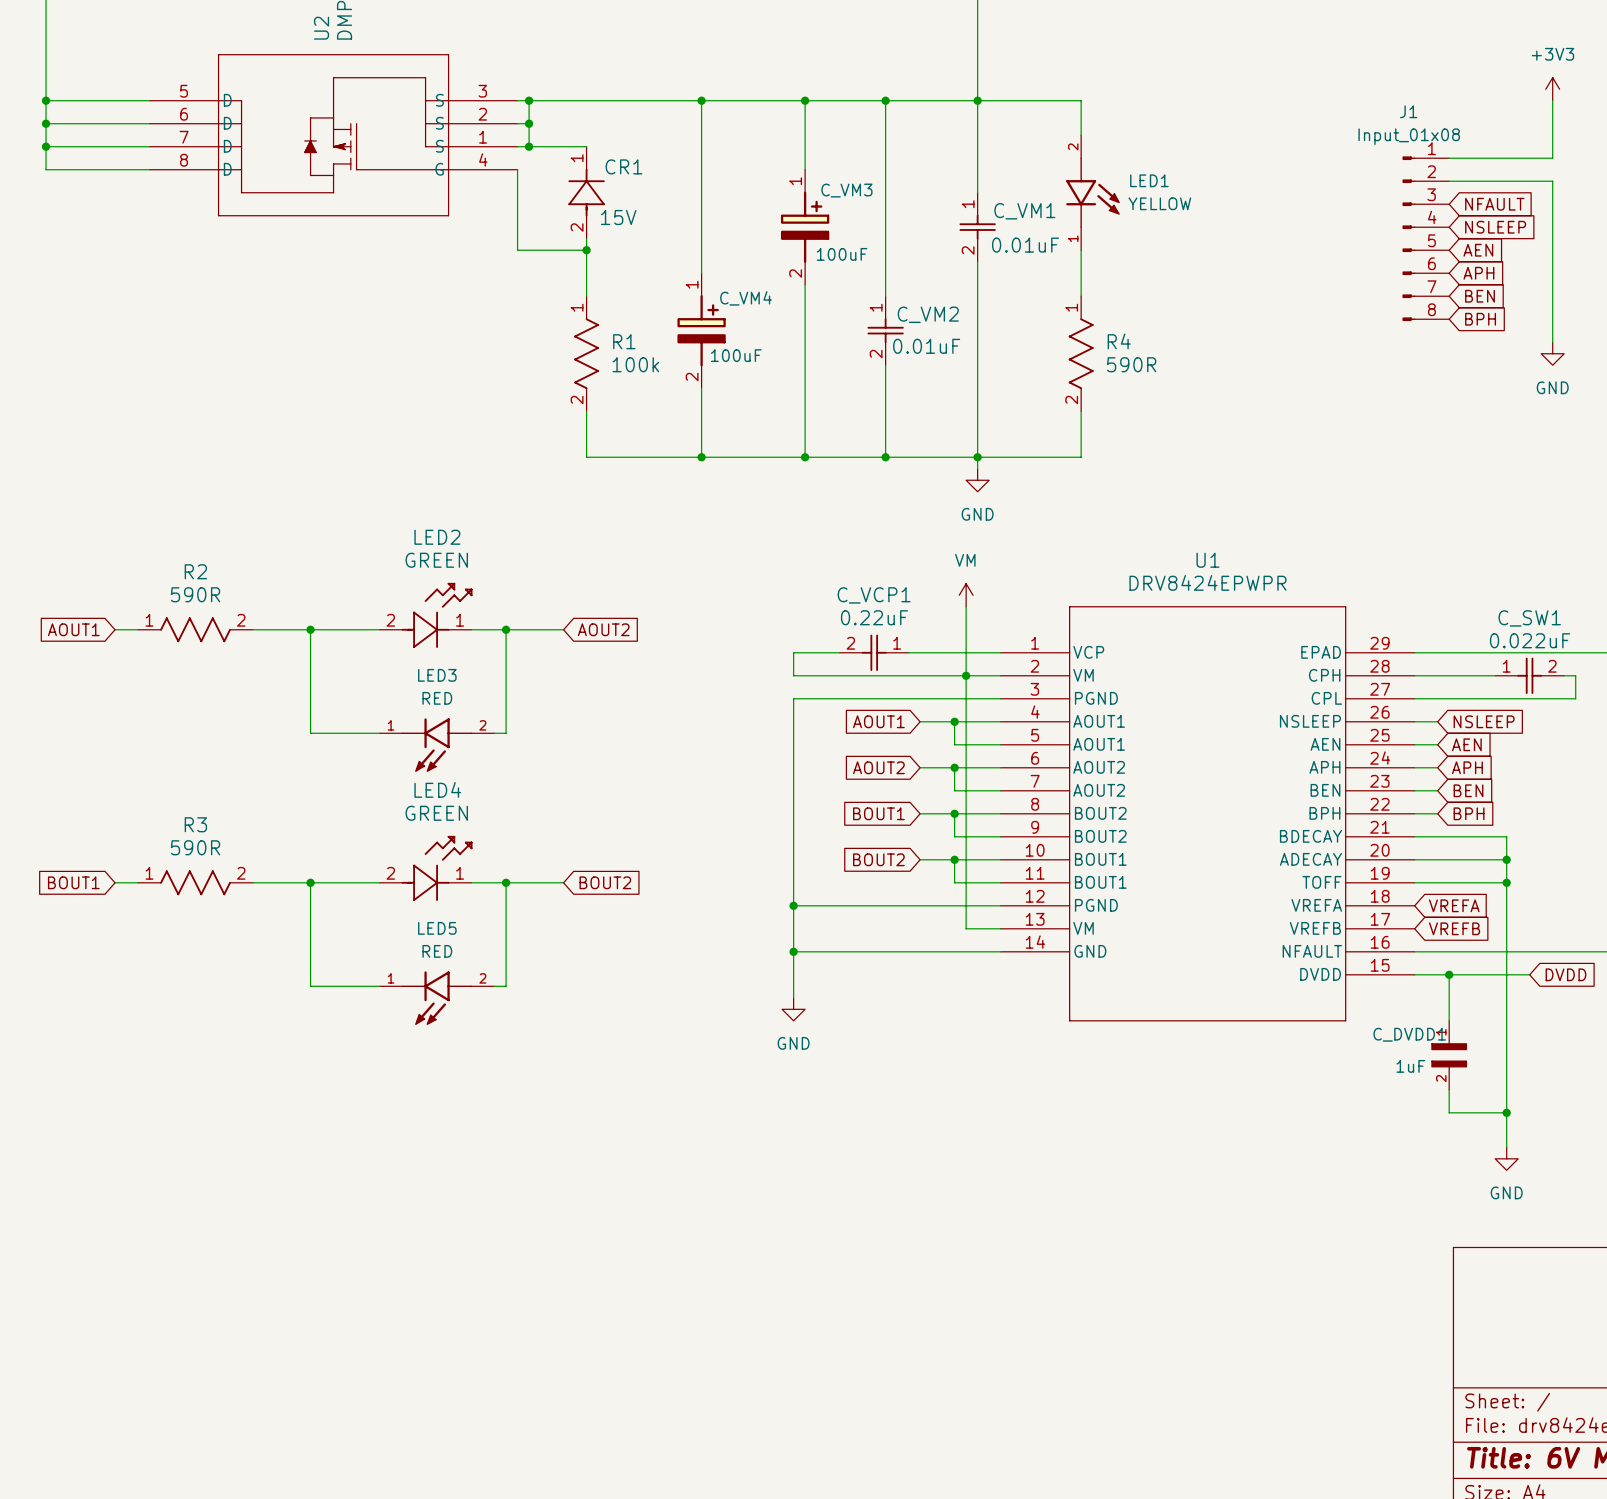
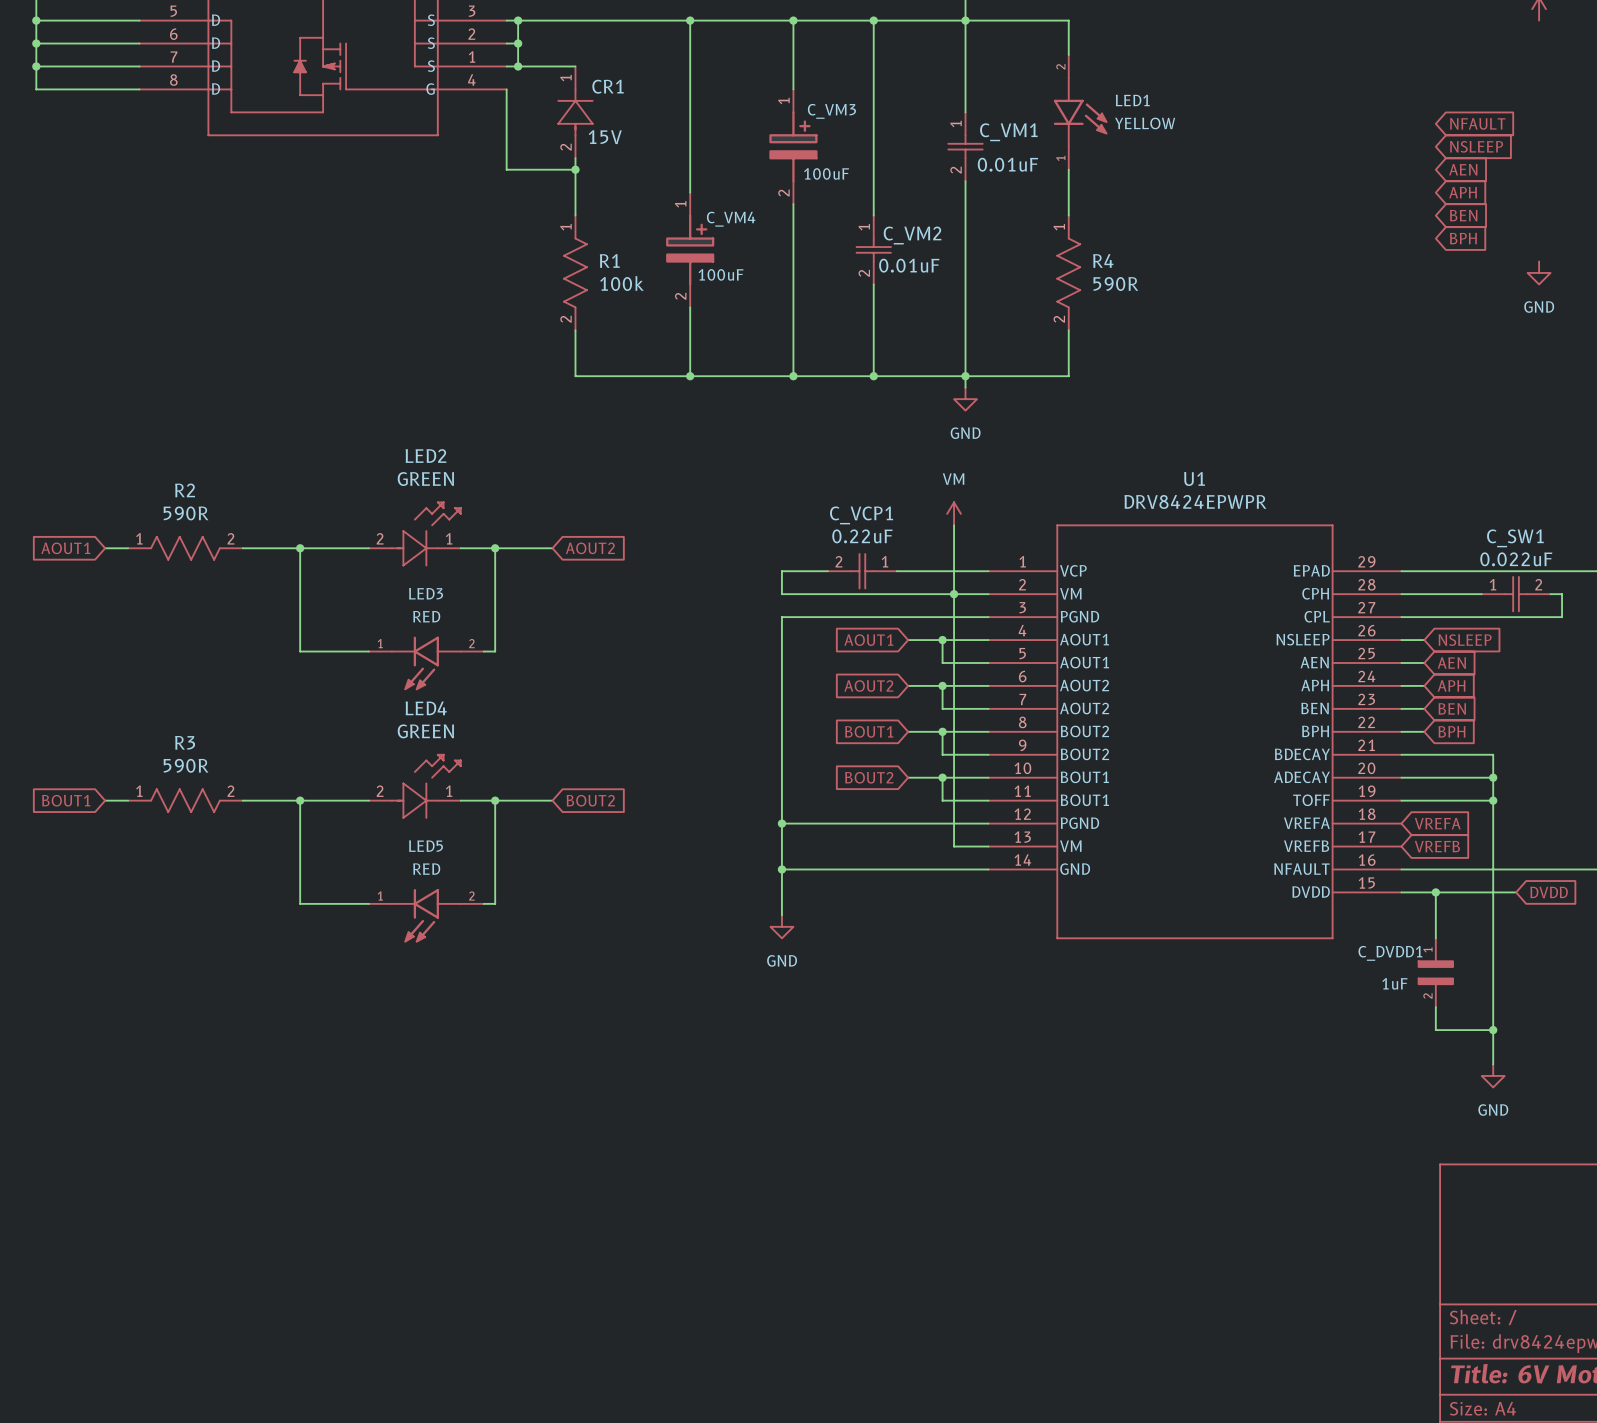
wire: (1552, 100) (1552, 158) (1449, 158) -> none
wire: (1449, 181) (1552, 181) (1552, 342) -> none
J1: Input_01x08 (1425, 238) -> none

